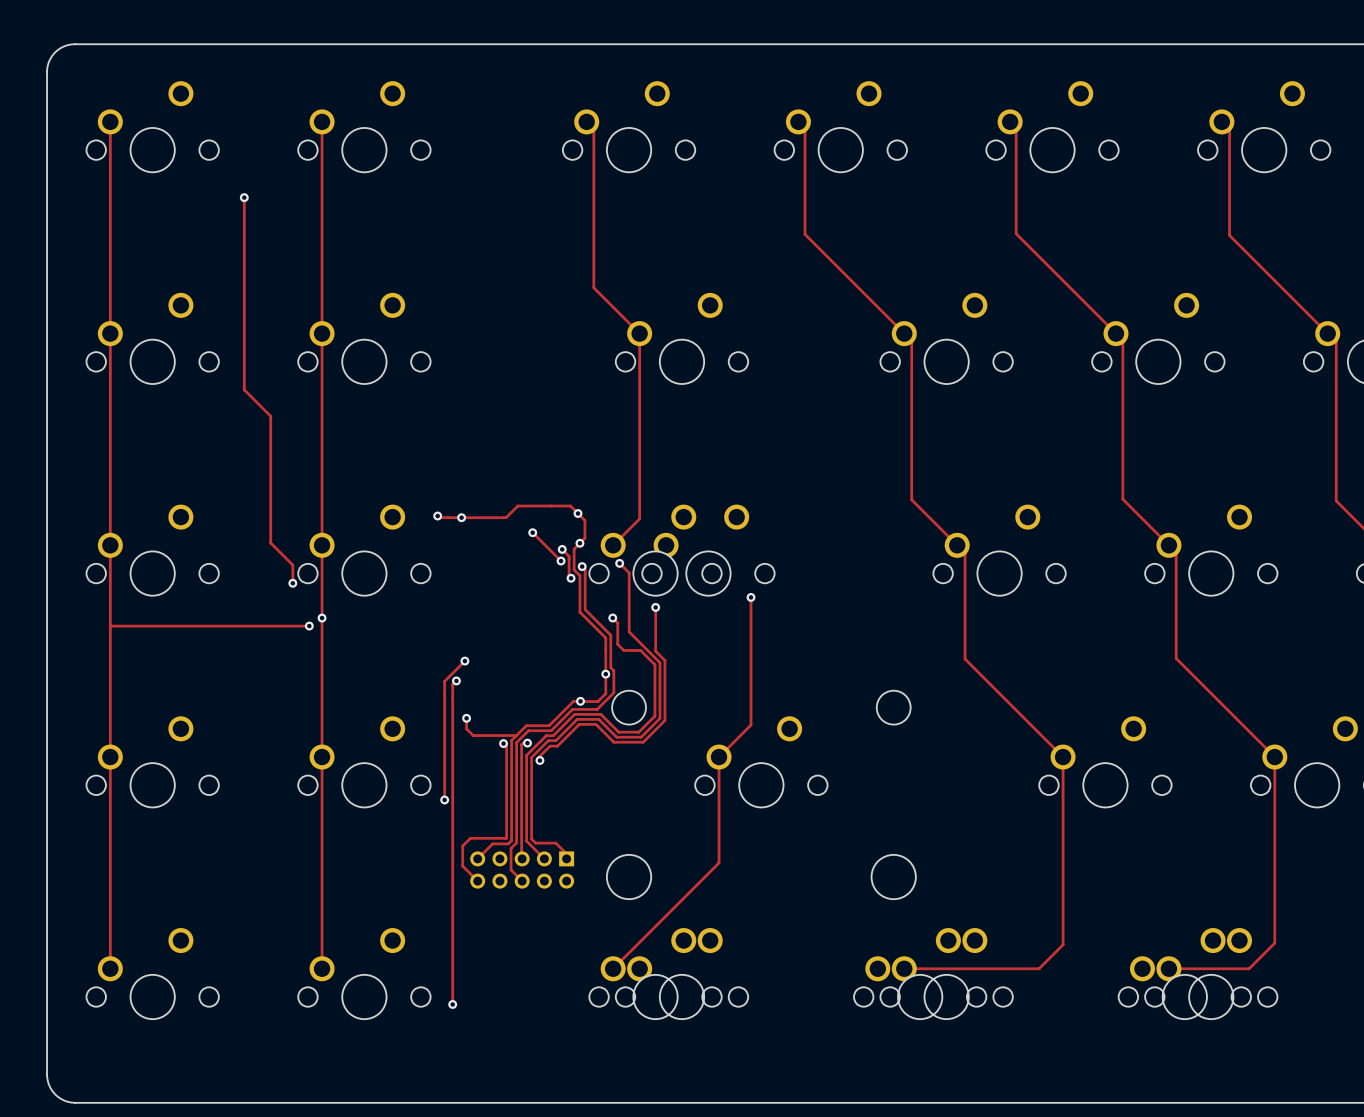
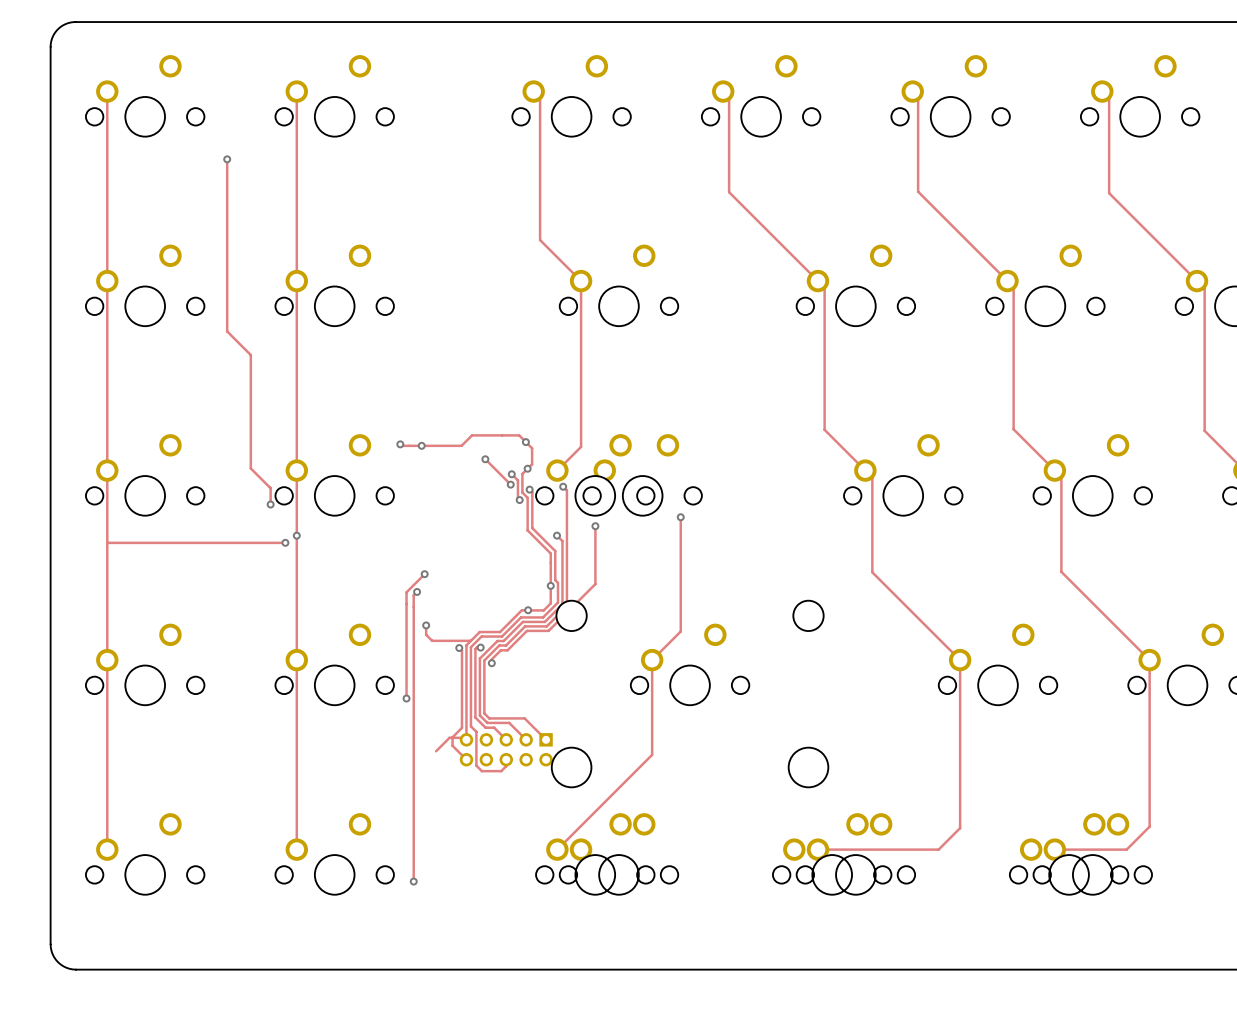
track: (623, 567) (629, 572) (629, 631) (659, 662) (659, 718) (641, 737) (616, 737) (598, 719) -> (566, 490) (566, 606) (544, 626)
track: (617, 623) (617, 644) (623, 650) (640, 650) (654, 664) (654, 716) (638, 732) (618, 732) (599, 714) -> (561, 540) (562, 604) (544, 621)
track: (655, 651) (664, 660) (664, 720) (643, 742) (613, 742) (596, 724) -> (595, 565) (595, 584) (548, 630) (542, 630)
track: (531, 816) (531, 839) (535, 843) (555, 843) (566, 853) (566, 858) -> (484, 713) (489, 718) (524, 718) (546, 739)
track: (526, 818) (526, 841) (544, 858) -> (479, 715) (487, 722) (509, 722) (526, 739)
track: (521, 821) (522, 858) -> (475, 717) (485, 727) (494, 727) (506, 739)
track: (516, 831) (516, 842) (511, 848) (511, 870) (522, 881) -> (470, 726) (476, 731) (476, 765) (481, 771) (501, 771) (506, 766) (506, 759)
track: (506, 832) (506, 838) (470, 838) (462, 846) (462, 866) (477, 881) -> (461, 727) (452, 737) (452, 745) (466, 759)
part position: (522, 870) -> (506, 749)

